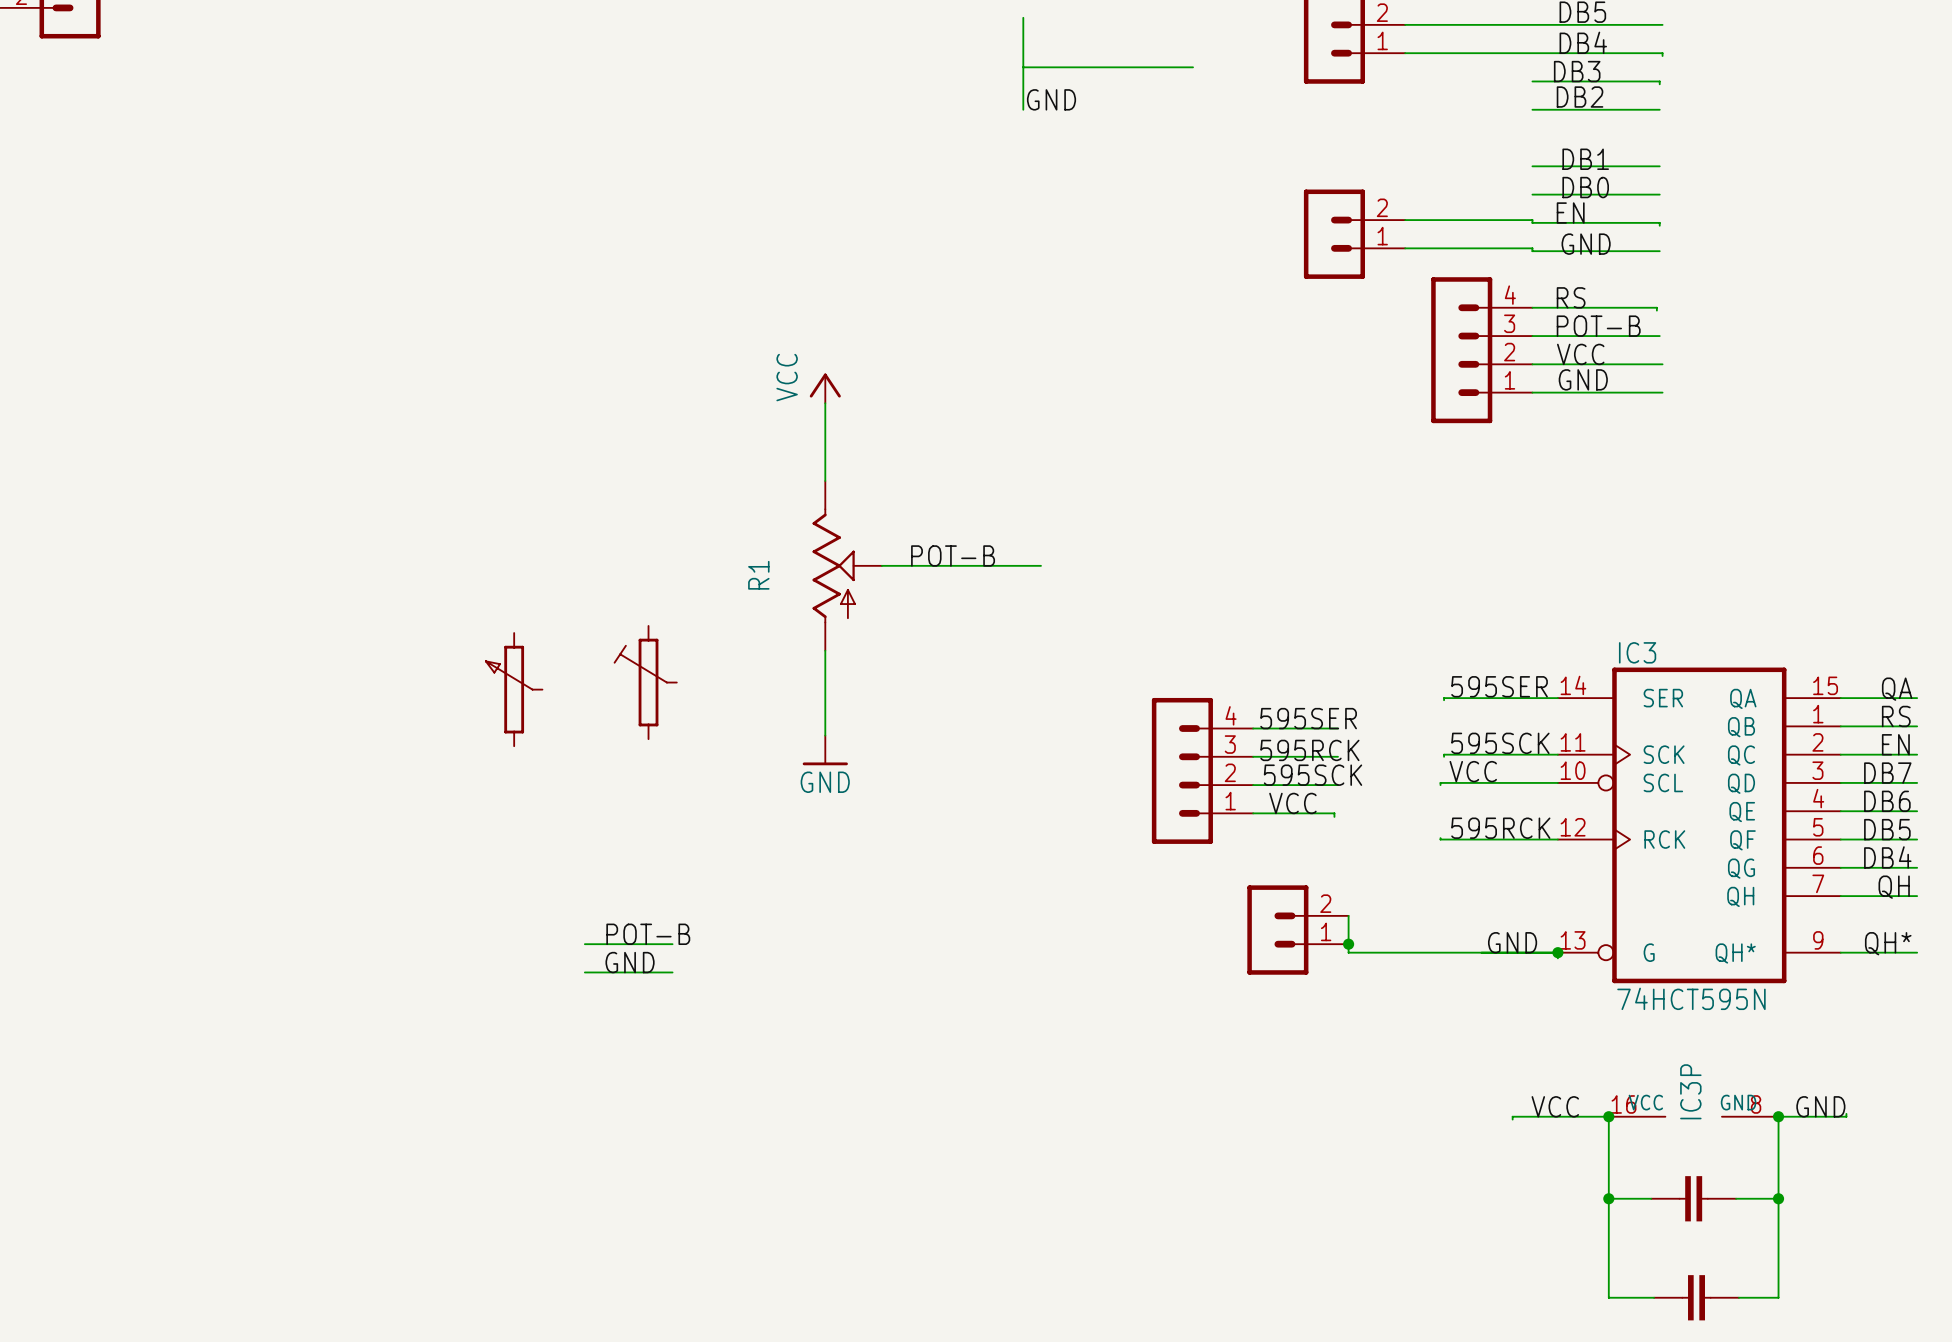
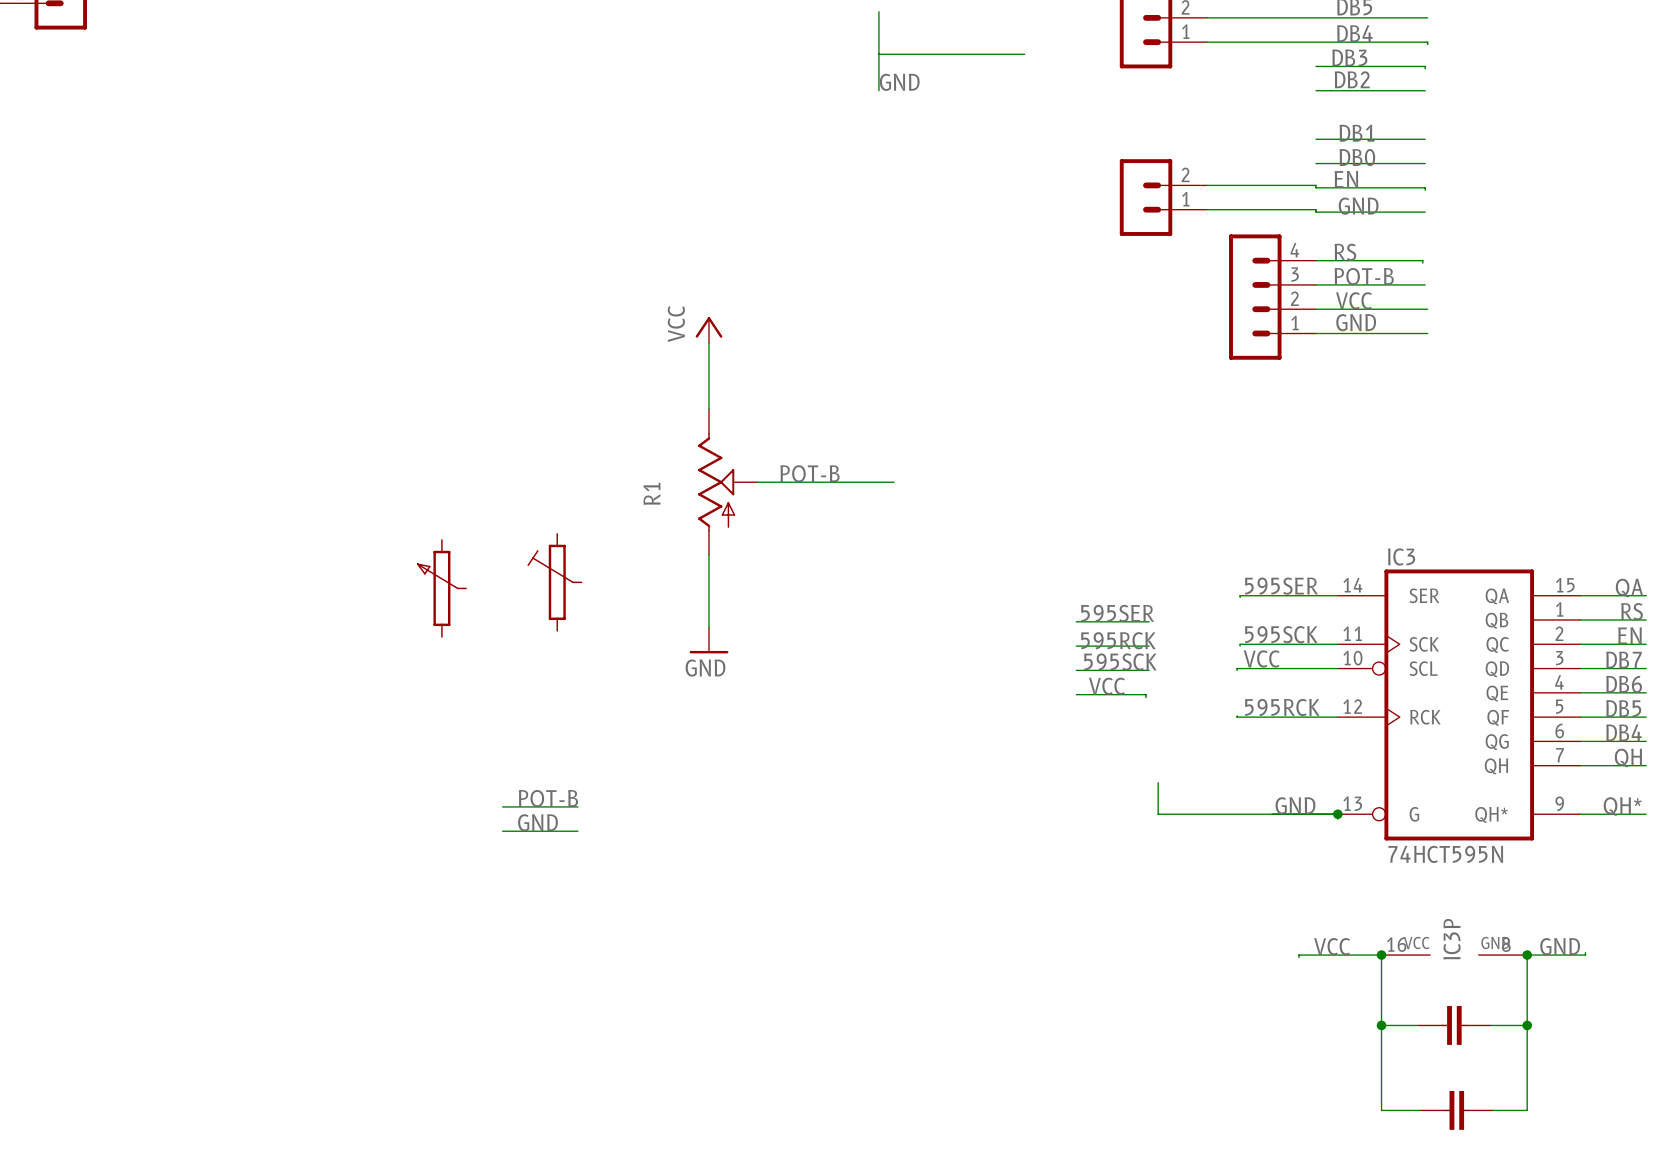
part: (1202, 770) -> none
part: (1297, 930) -> none
junction: (1348, 944) -> none

